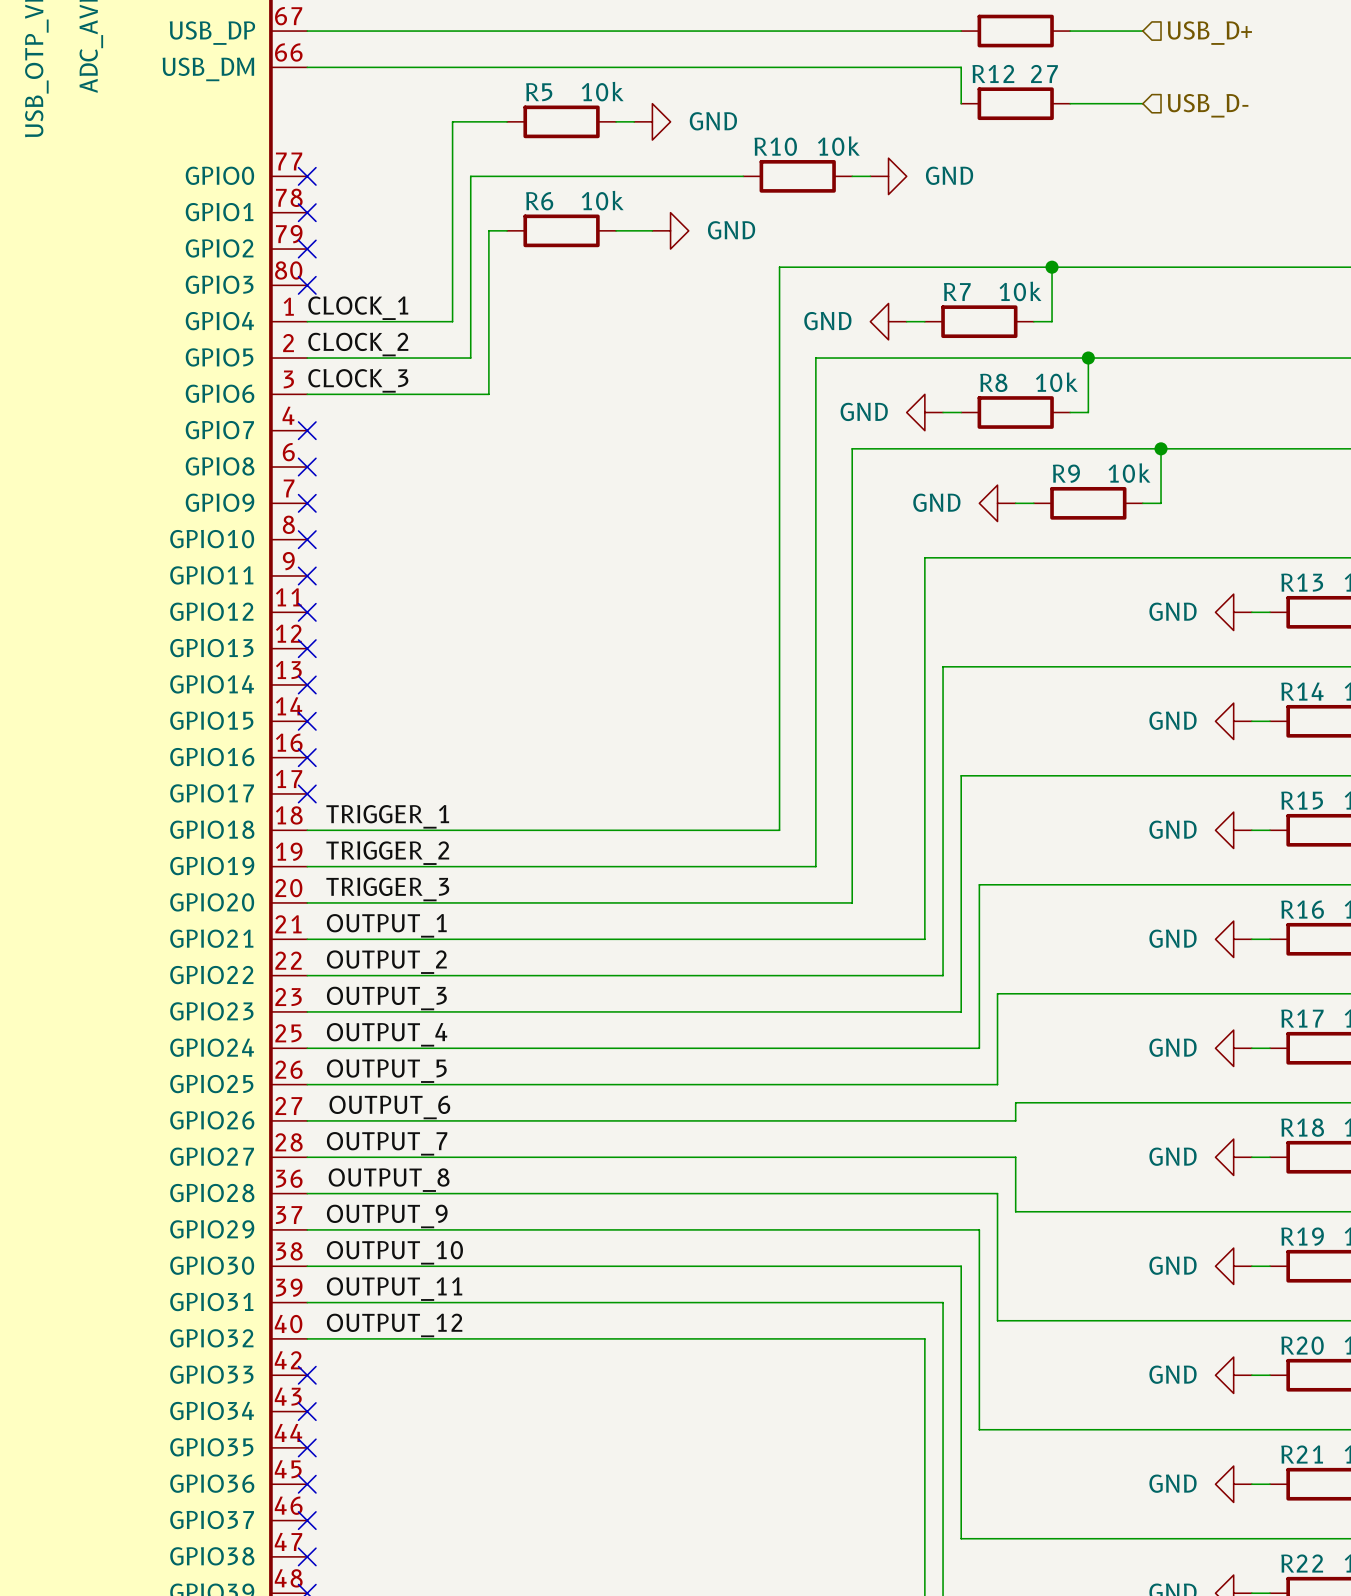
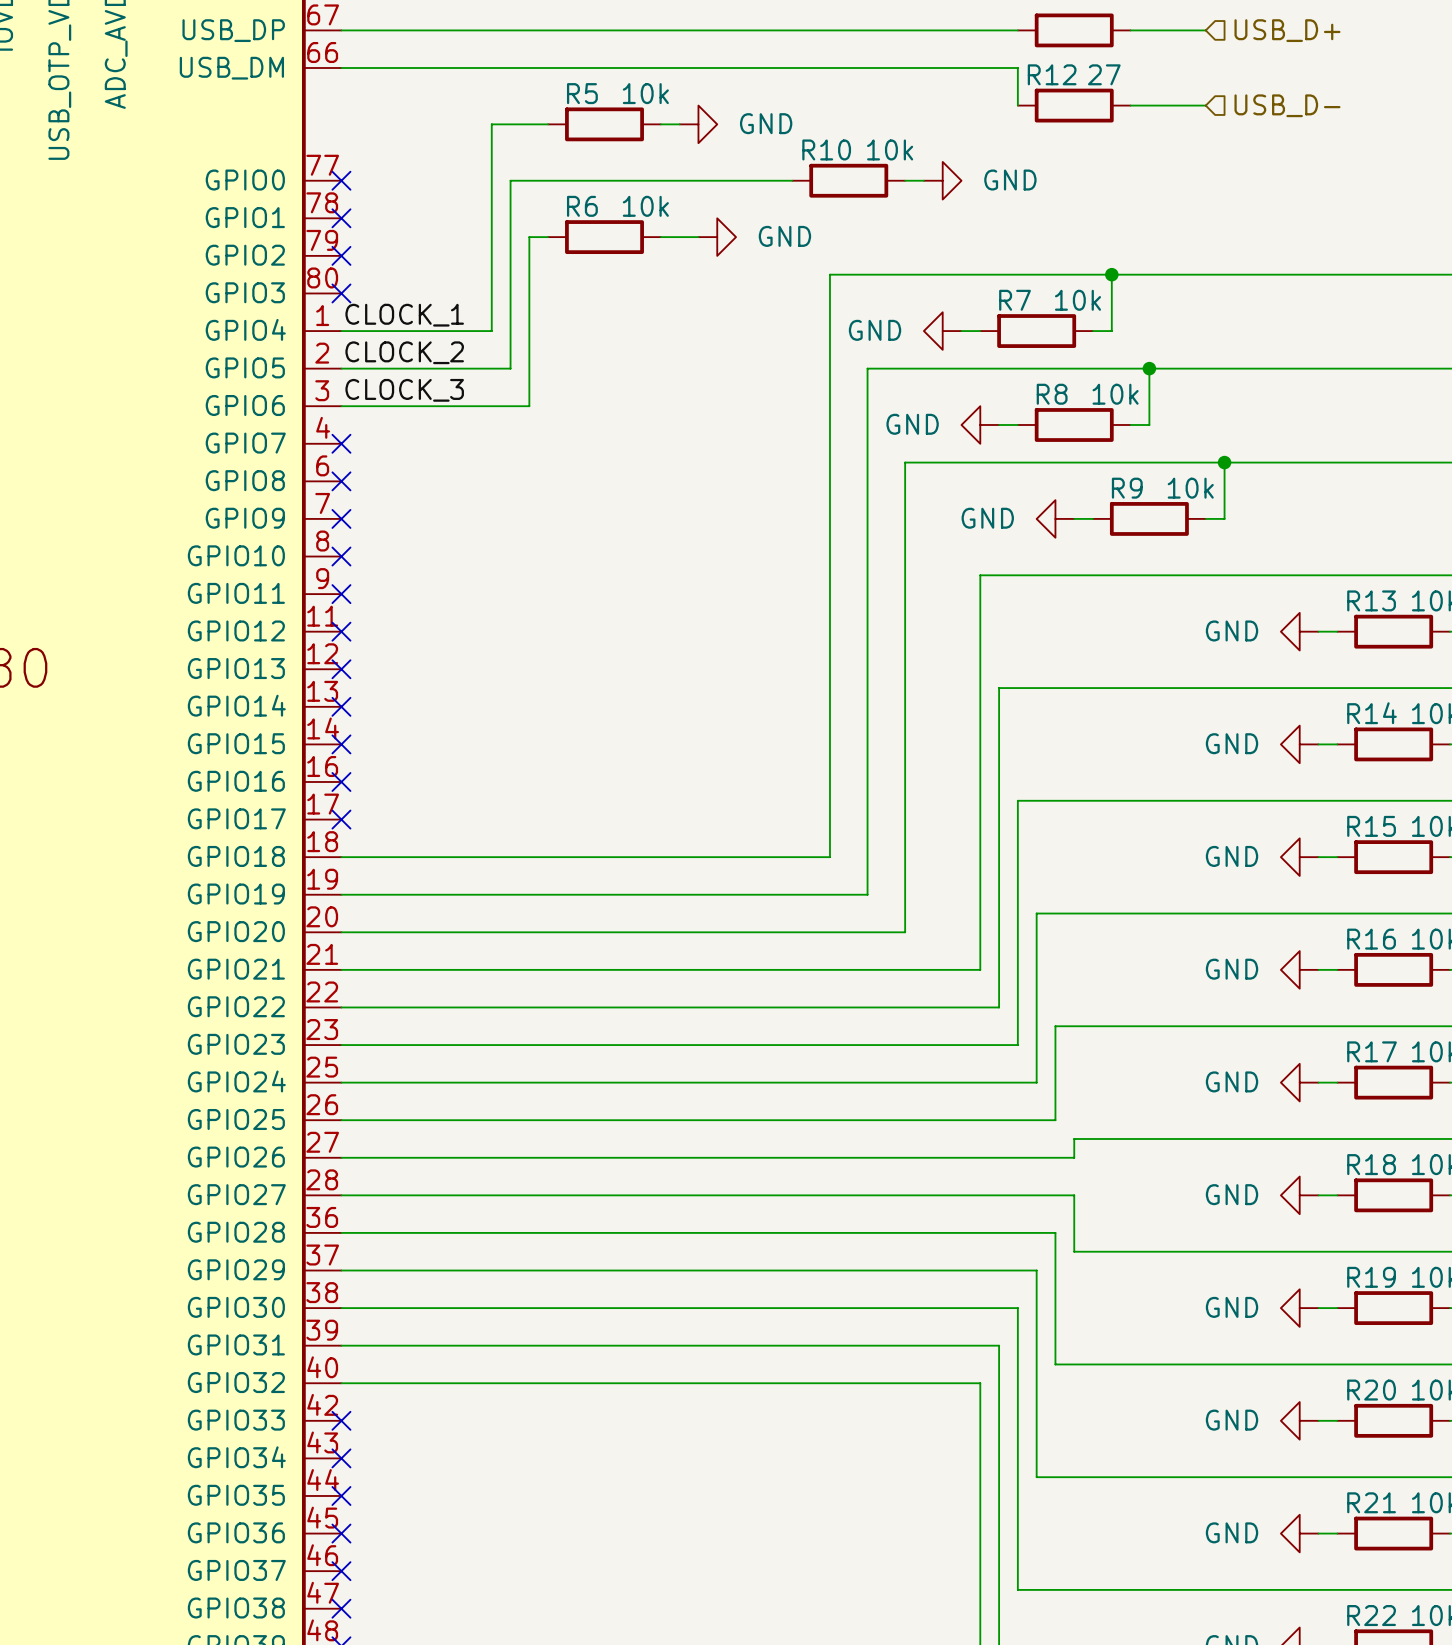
label: TRIGGER_1 (387, 816) -> none
label: TRIGGER_2 (387, 853) -> none
label: TRIGGER_3 (387, 889) -> none
label: OUTPUT_1 (386, 925) -> none
label: OUTPUT_2 (386, 962) -> none
label: OUTPUT_3 (386, 998) -> none
label: OUTPUT_4 (387, 1034) -> none
label: OUTPUT_5 (386, 1071) -> none
label: OUTPUT_6 (389, 1107) -> none
label: OUTPUT_7 (387, 1143) -> none
label: OUTPUT_8 (389, 1180) -> none
label: OUTPUT_9 (387, 1216) -> none
label: OUTPUT_10 (394, 1252) -> none
label: OUTPUT_11 (394, 1289) -> none
label: OUTPUT_12 (394, 1325) -> none

